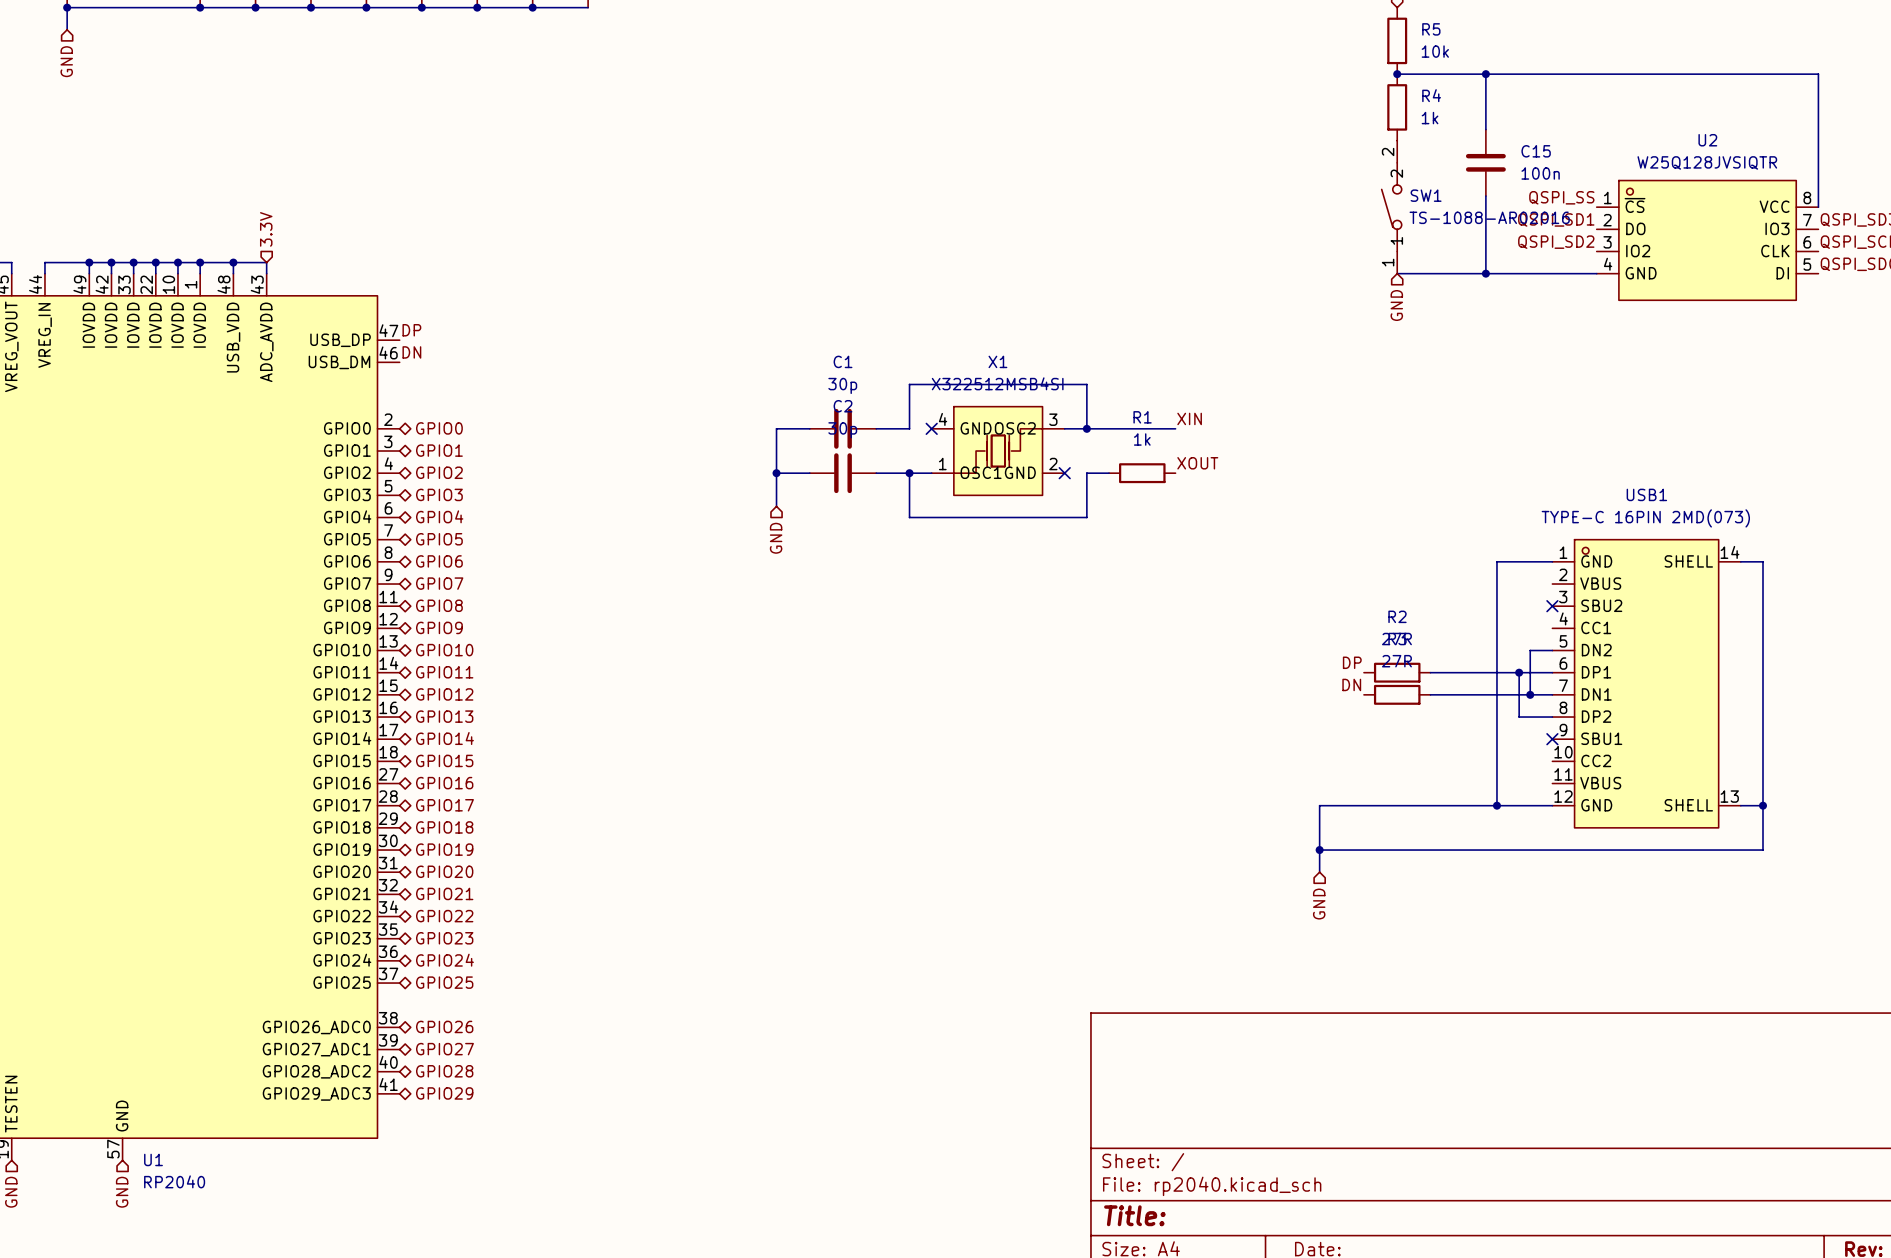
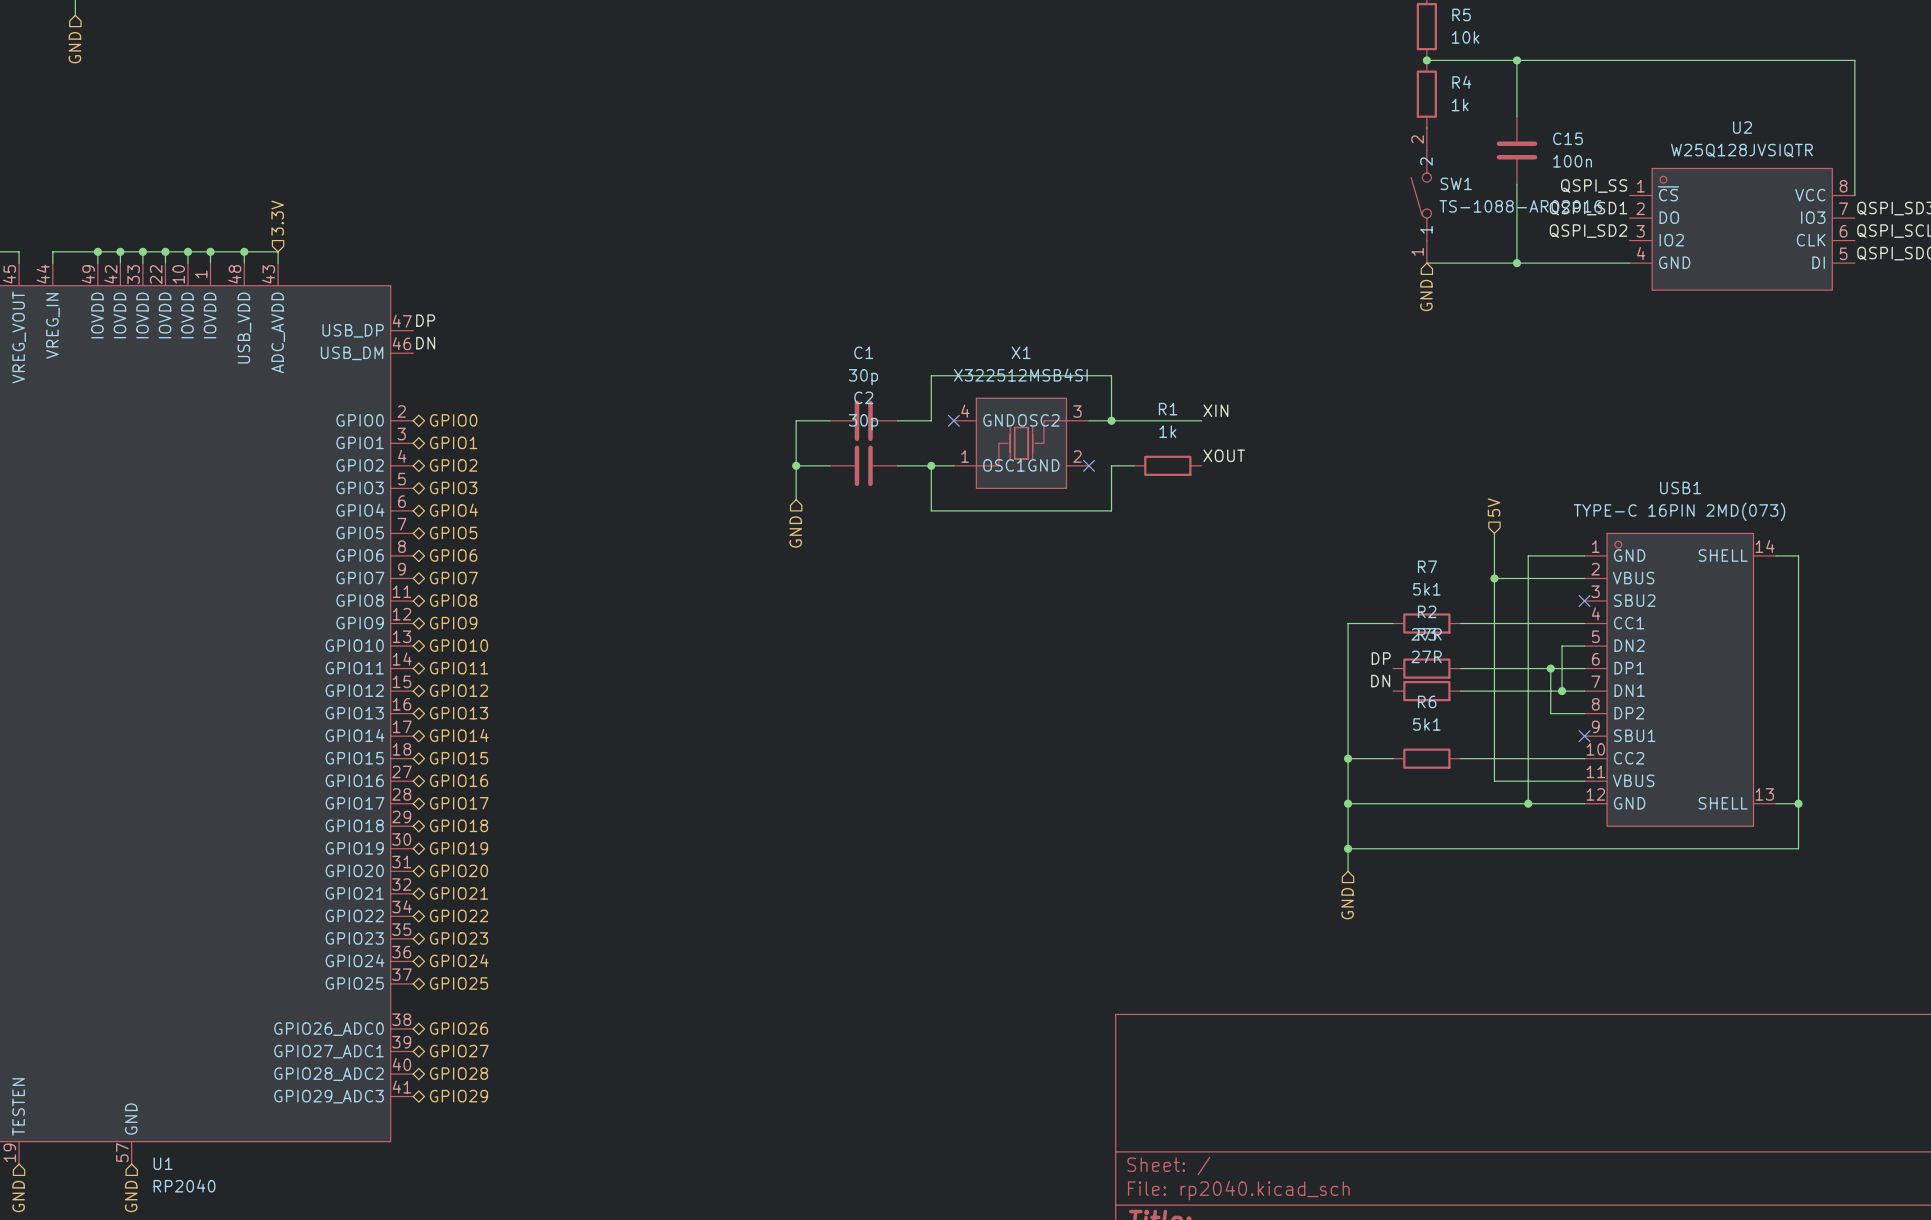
hierarchical label: none -> 5V (1494, 507)
wire: none -> (1494, 533) (1494, 781) (1584, 781)
wire: none -> (1494, 578) (1584, 578)
junction: none -> (1494, 578)
wire: none -> (1393, 623) (1348, 623) (1348, 803)
R7: none -> 5k1 (1426, 623)
wire: none -> (1460, 623) (1584, 623)
wire: none -> (1348, 758) (1393, 758)
junction: none -> (1348, 758)
R6: none -> 5k1 (1426, 758)
wire: none -> (1460, 758) (1584, 758)
junction: none -> (1348, 803)

